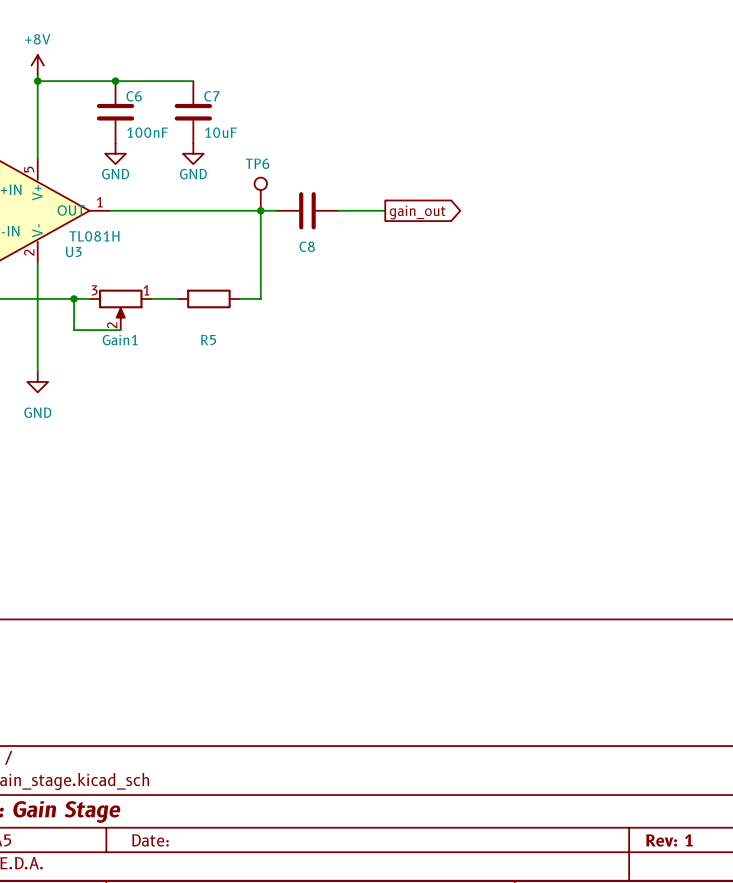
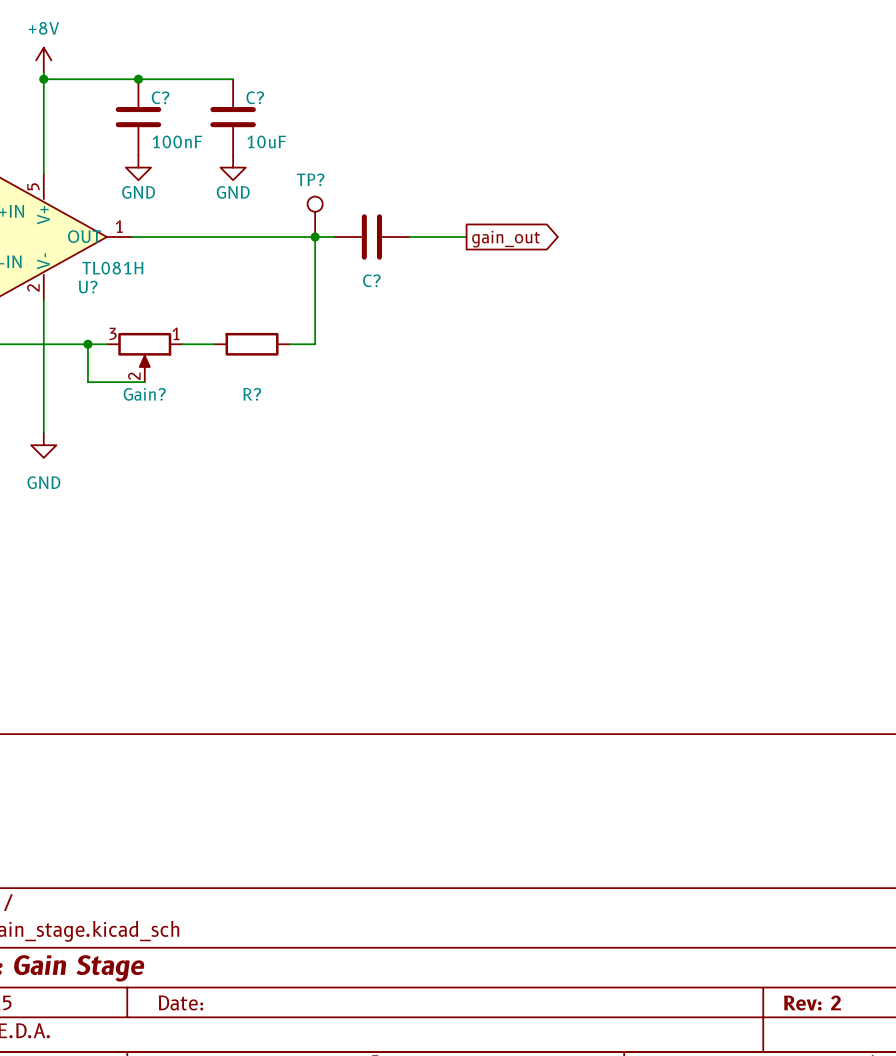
C6 name: C6 (134, 96) -> C? (160, 97)
C7 name: C7 (211, 96) -> C? (255, 97)
TP6 name: TP6 (257, 163) -> TP? (310, 179)
C8 name: C8 (307, 246) -> C? (371, 280)
U3 name: U3 (73, 251) -> U? (88, 287)
Gain1 name: Gain1 (120, 340) -> Gain? (144, 394)
R5 name: R5 (208, 340) -> R? (252, 394)
title block: Rev: 1 (669, 840) -> Rev: 2 (812, 1003)

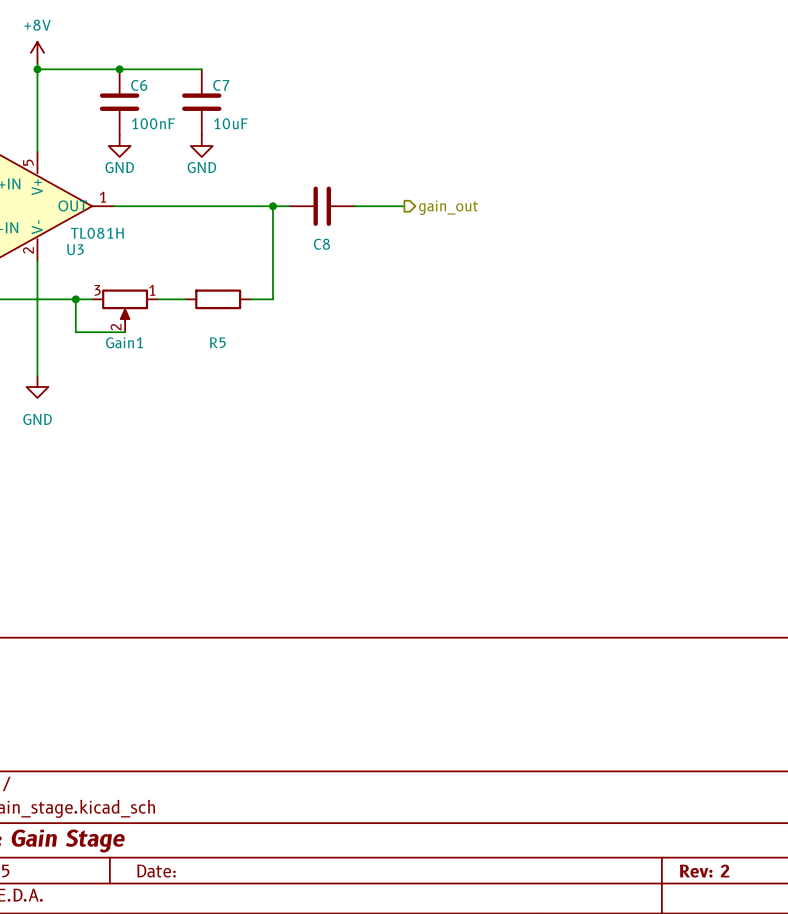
C? name: C? (160, 97) -> C6 (139, 85)
C? name: C? (255, 97) -> C7 (221, 85)
TP?: (315, 216) -> none
hierarchical label: none -> gain_out (448, 207)
global label: gain_out (506, 239) -> none
C? name: C? (371, 280) -> C8 (321, 244)
U? name: U? (88, 287) -> U3 (75, 249)
Gain? name: Gain? (144, 394) -> Gain1 (124, 342)
R? name: R? (252, 394) -> R5 (217, 342)

